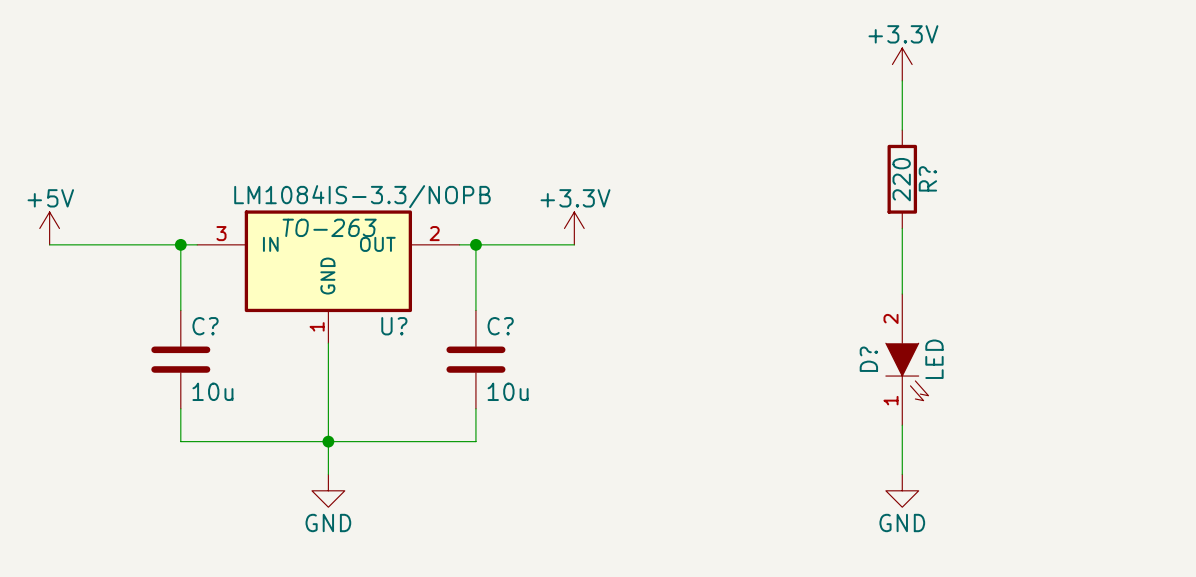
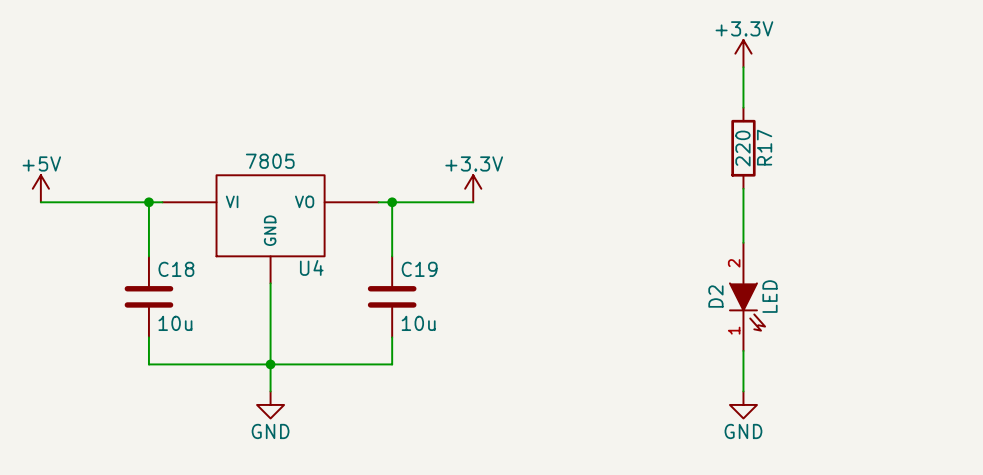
R? name: R? (927, 178) -> R17 (764, 147)
U?: LM1084IS-3.3/NOPB (328, 276) -> none
U4: none -> 7805 (270, 229)
C? name: C? (205, 326) -> C18 (176, 269)
C? name: C? (500, 326) -> C19 (419, 269)
D? name: D? (868, 359) -> D2 (715, 296)

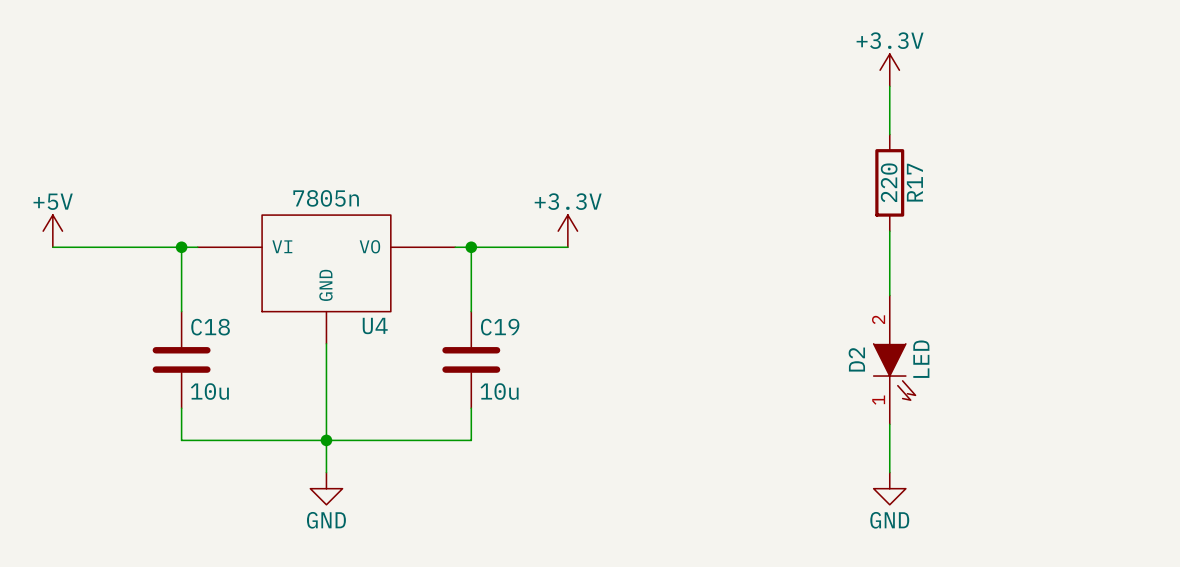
U4 value: 7805 (270, 161) -> 7805n (326, 198)

